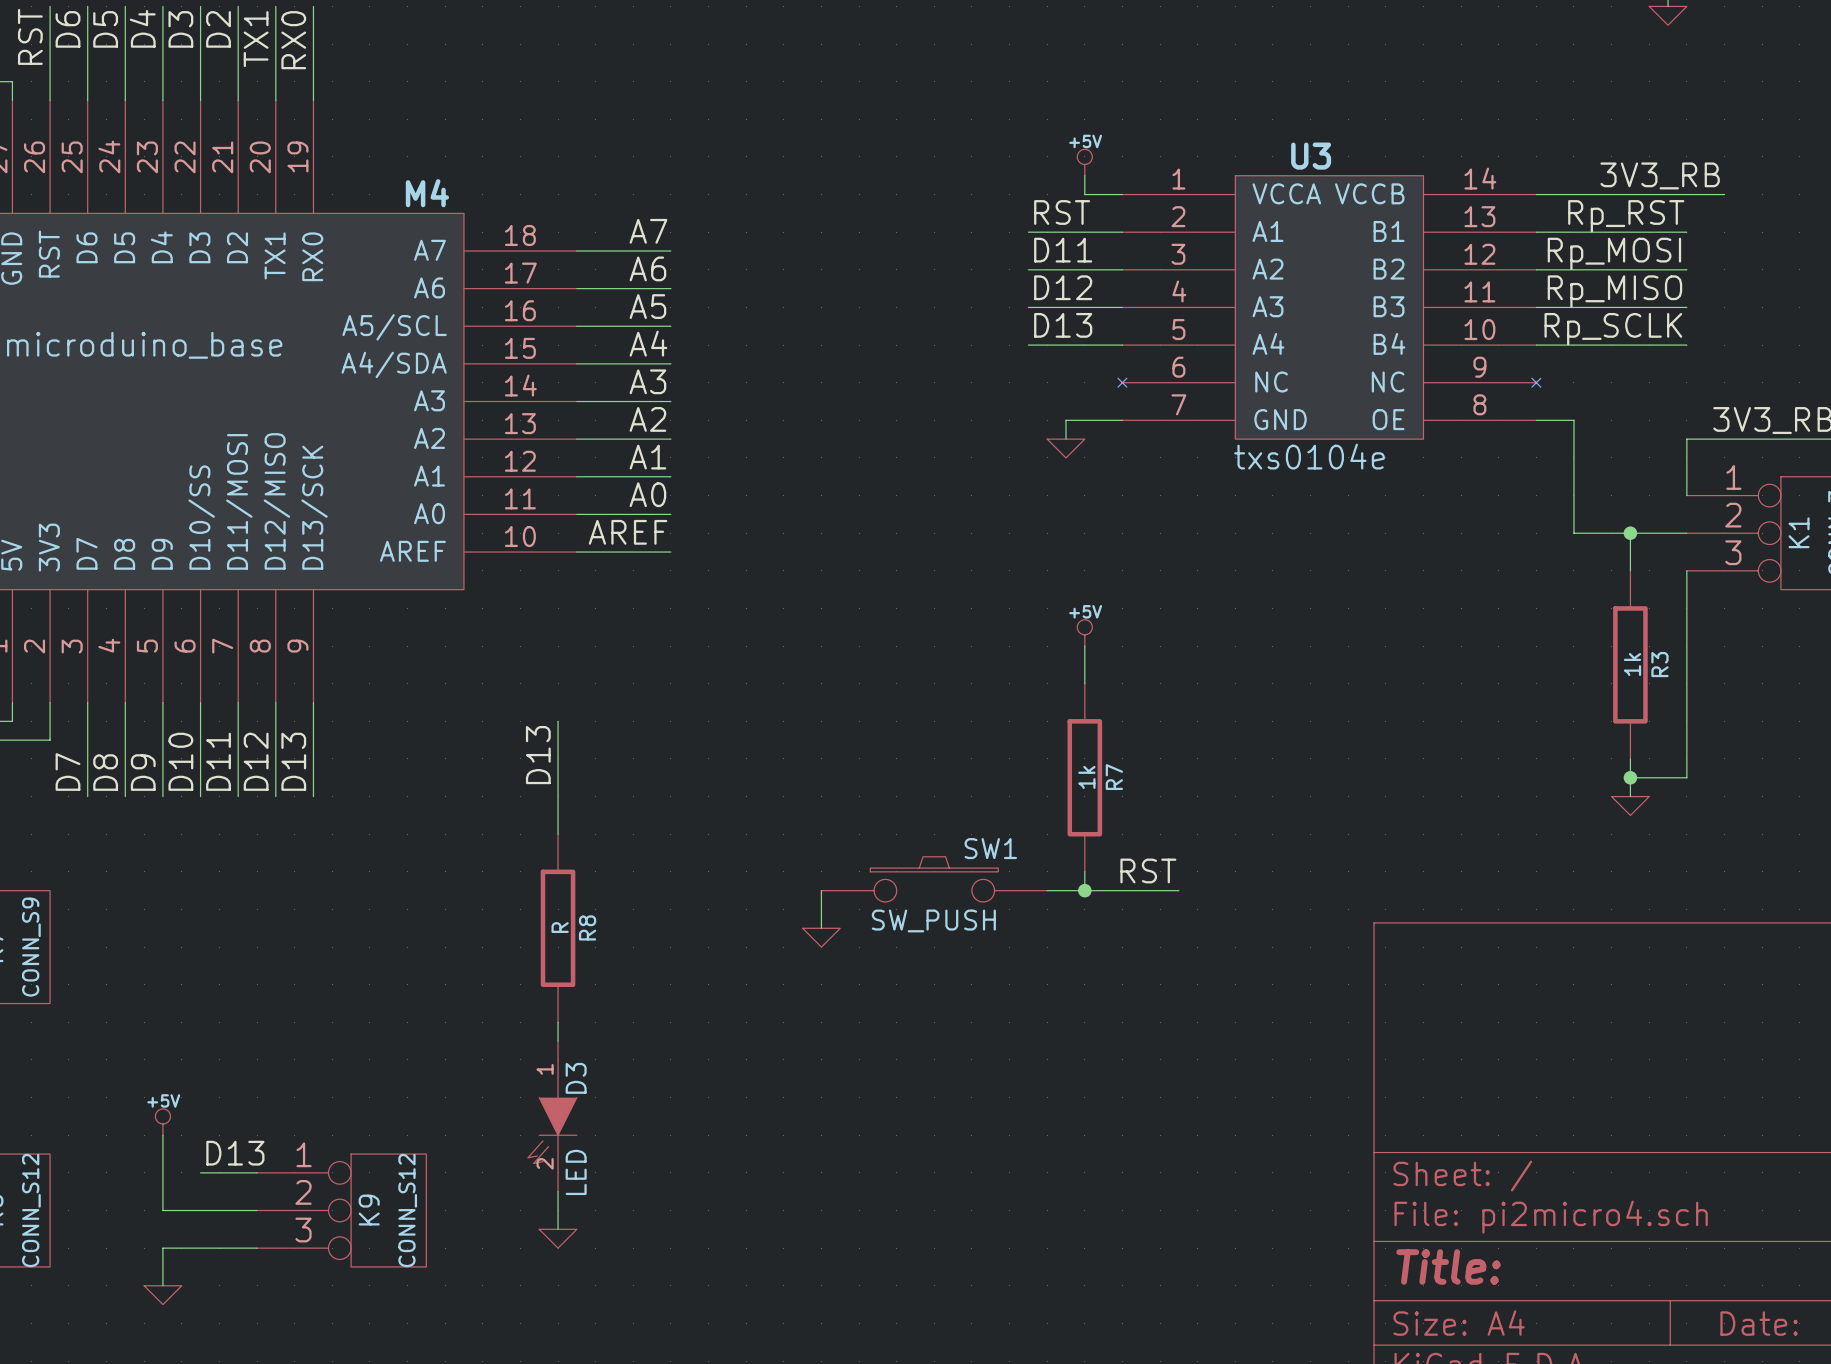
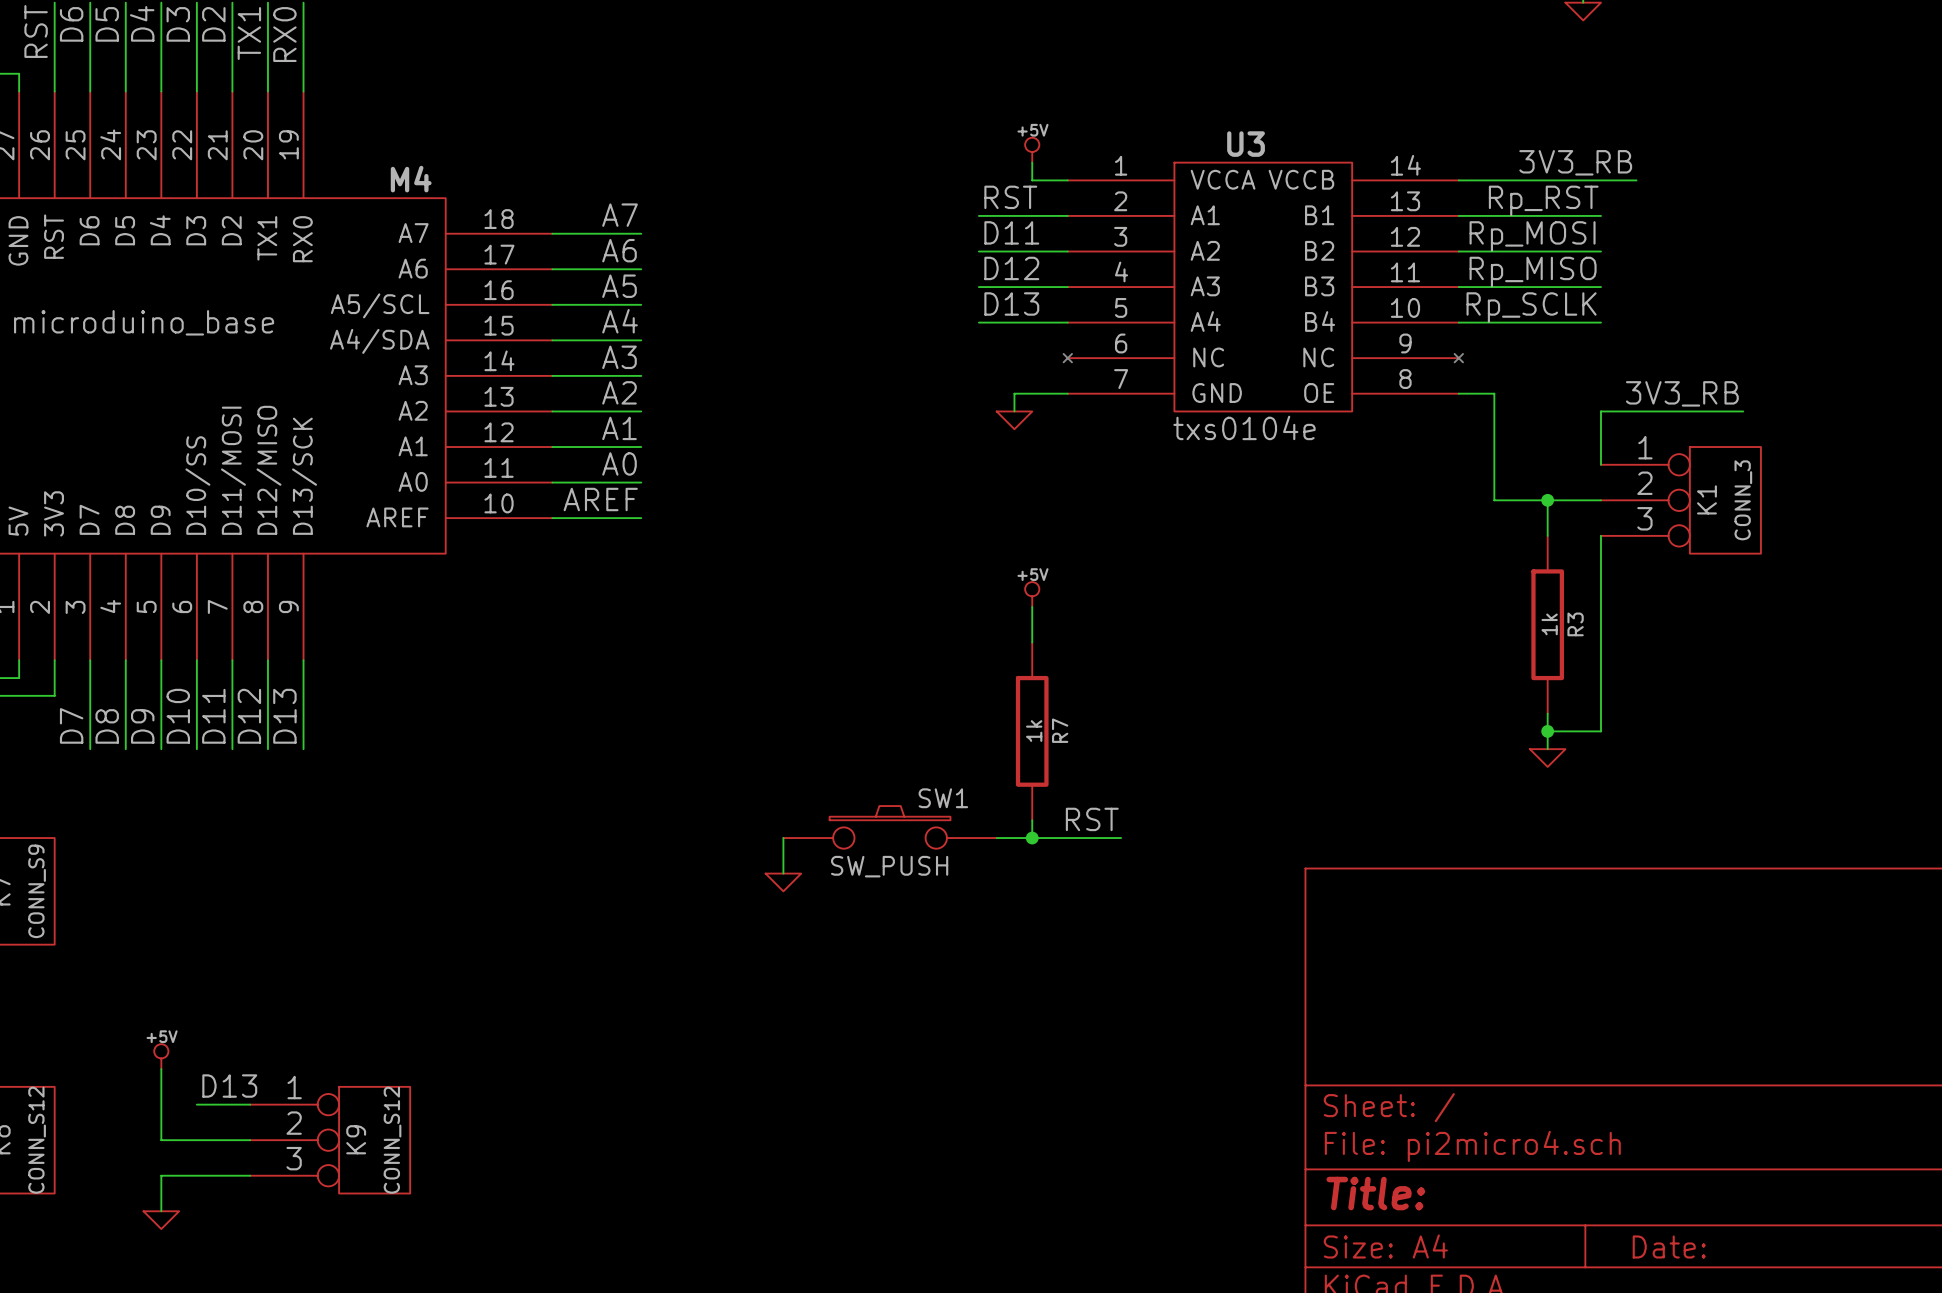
wire: (558, 721) (558, 834) -> none
label: D13 (538, 755) -> none
R8: R (558, 928) -> none
wire: (558, 1022) (558, 1041) -> none
D3: LED (552, 1116) -> none
wire: (558, 1191) (558, 1229) -> none
power symbol: (558, 1238) -> none

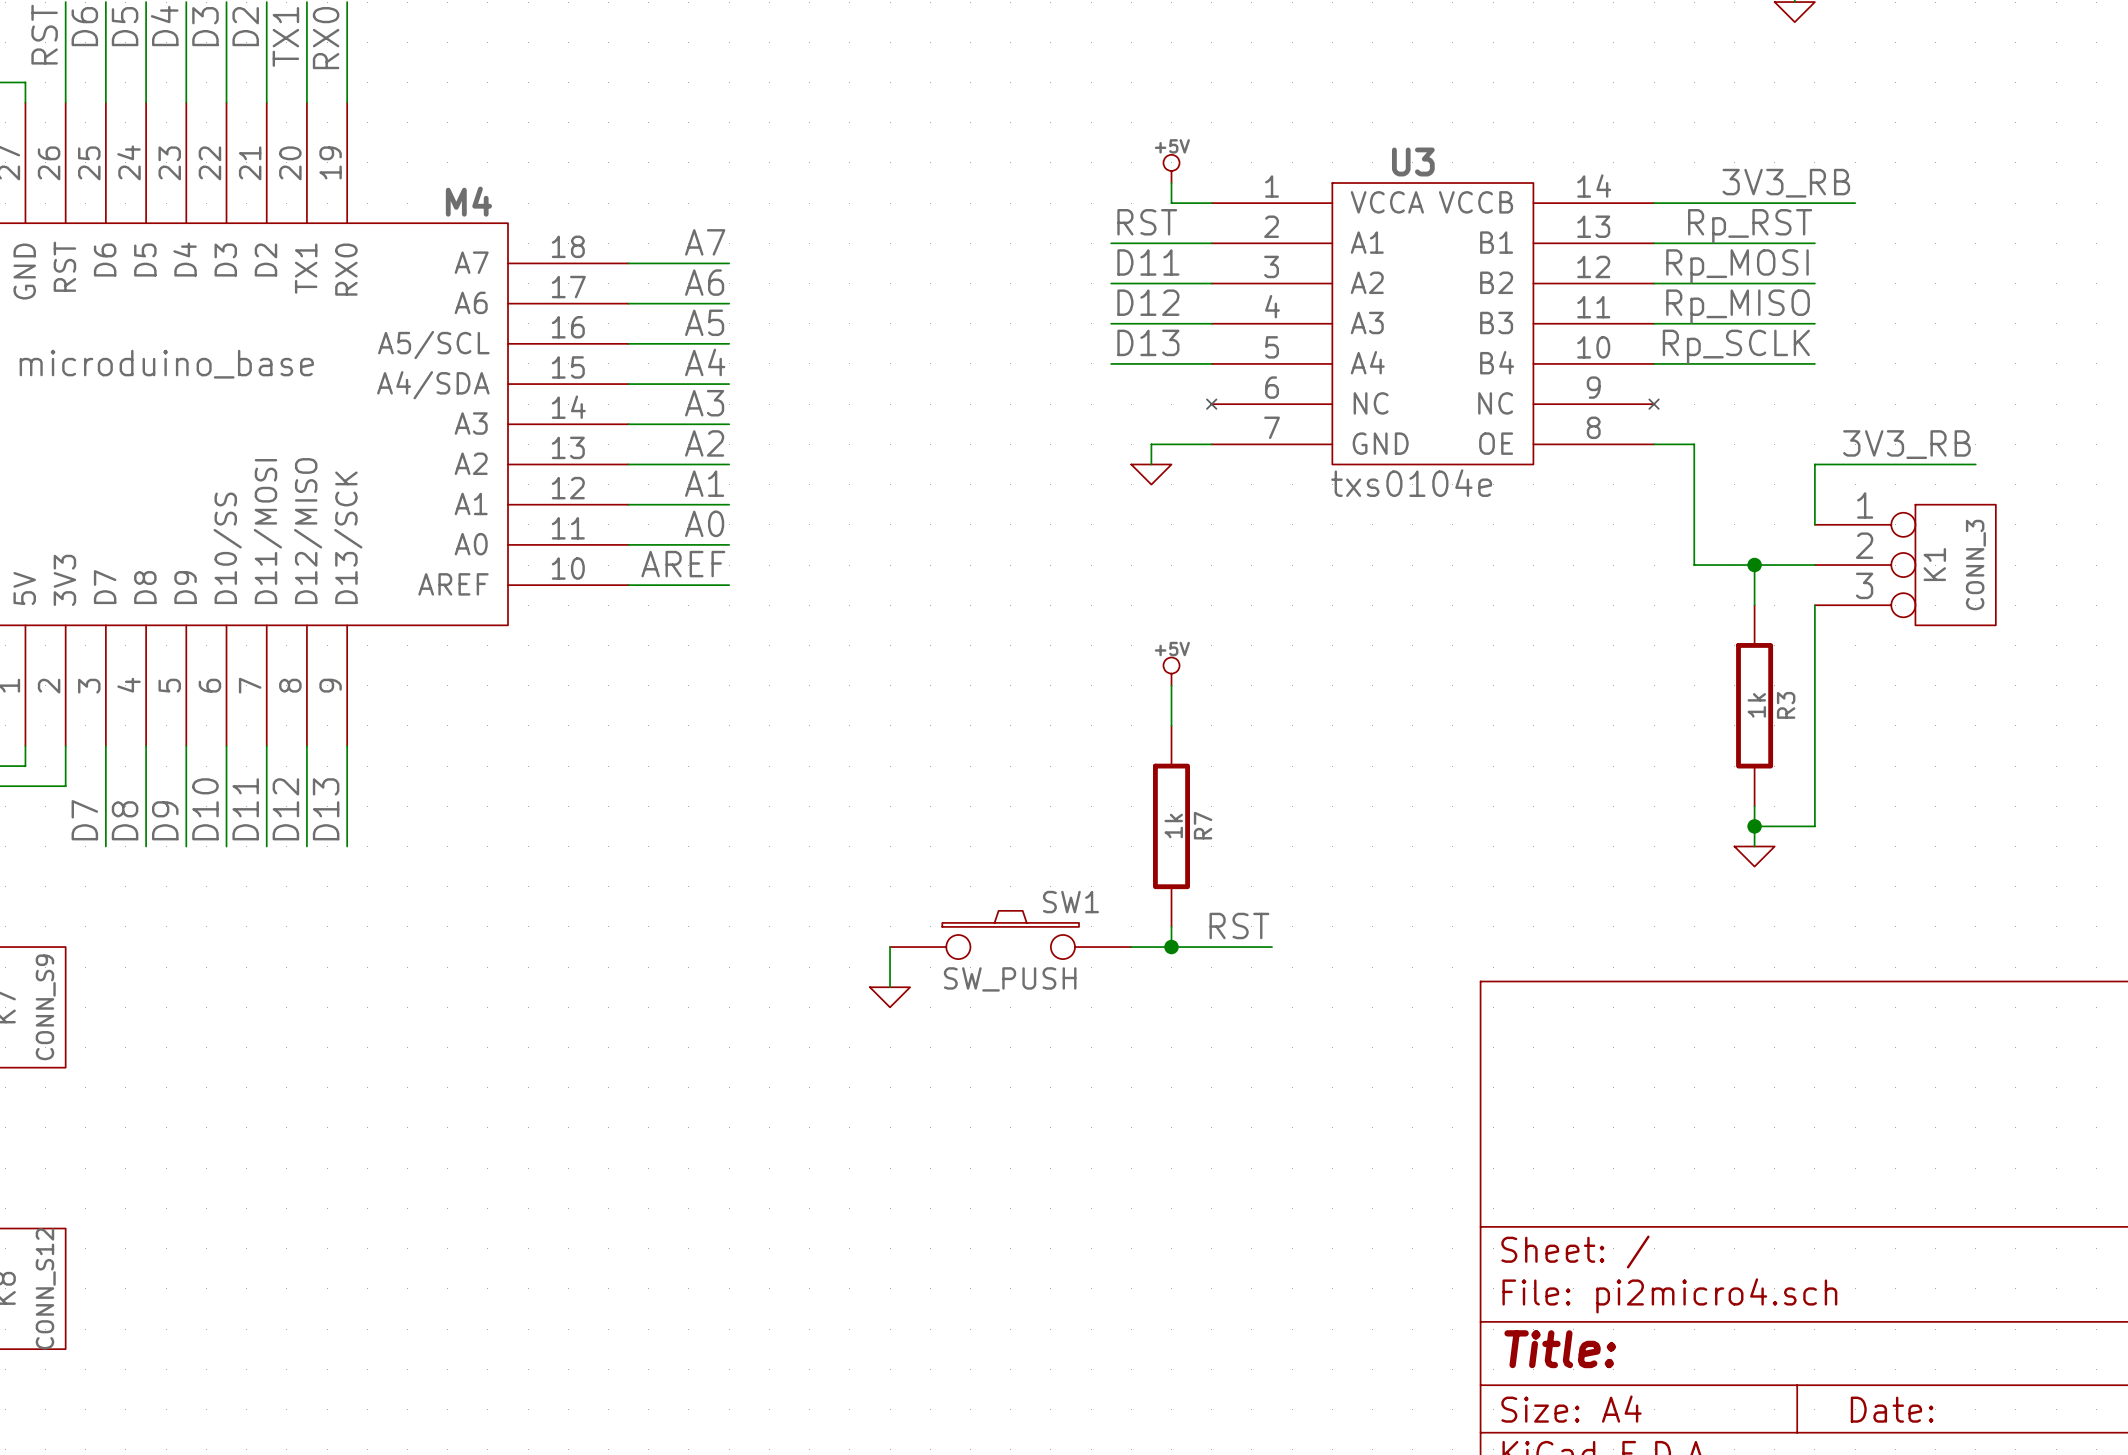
power symbol: +5V (161, 1056) -> none
wire: (161, 1069) (161, 1140) (250, 1140) -> none
label: D13 (229, 1086) -> none
wire: (196, 1104) (250, 1104) -> none
K9: CONN_S12 (330, 1140) -> none
wire: (250, 1175) (161, 1175) (161, 1211) -> none
power symbol: (161, 1220) -> none

